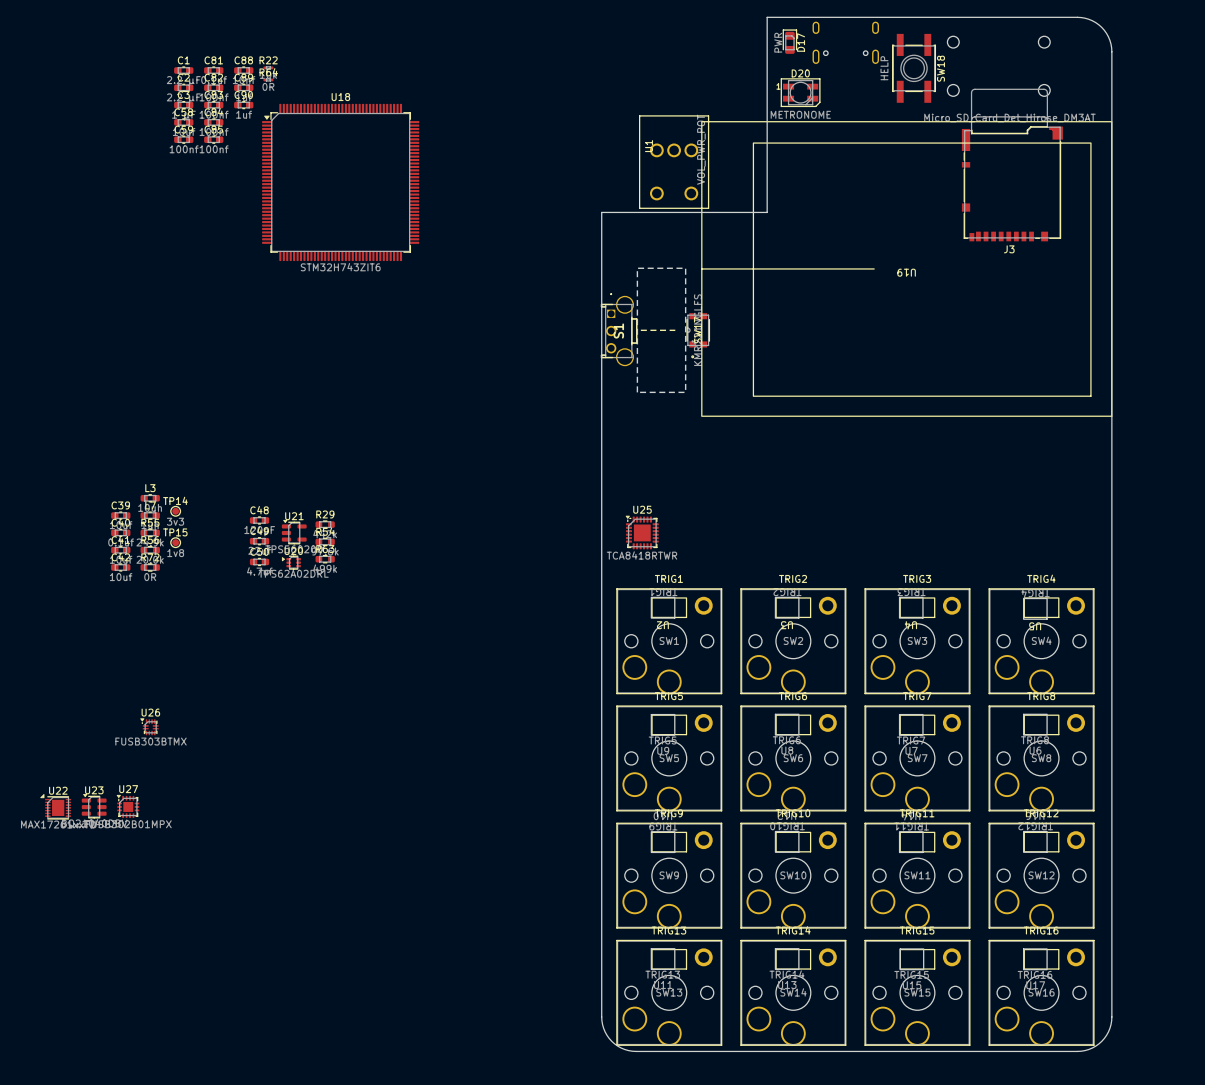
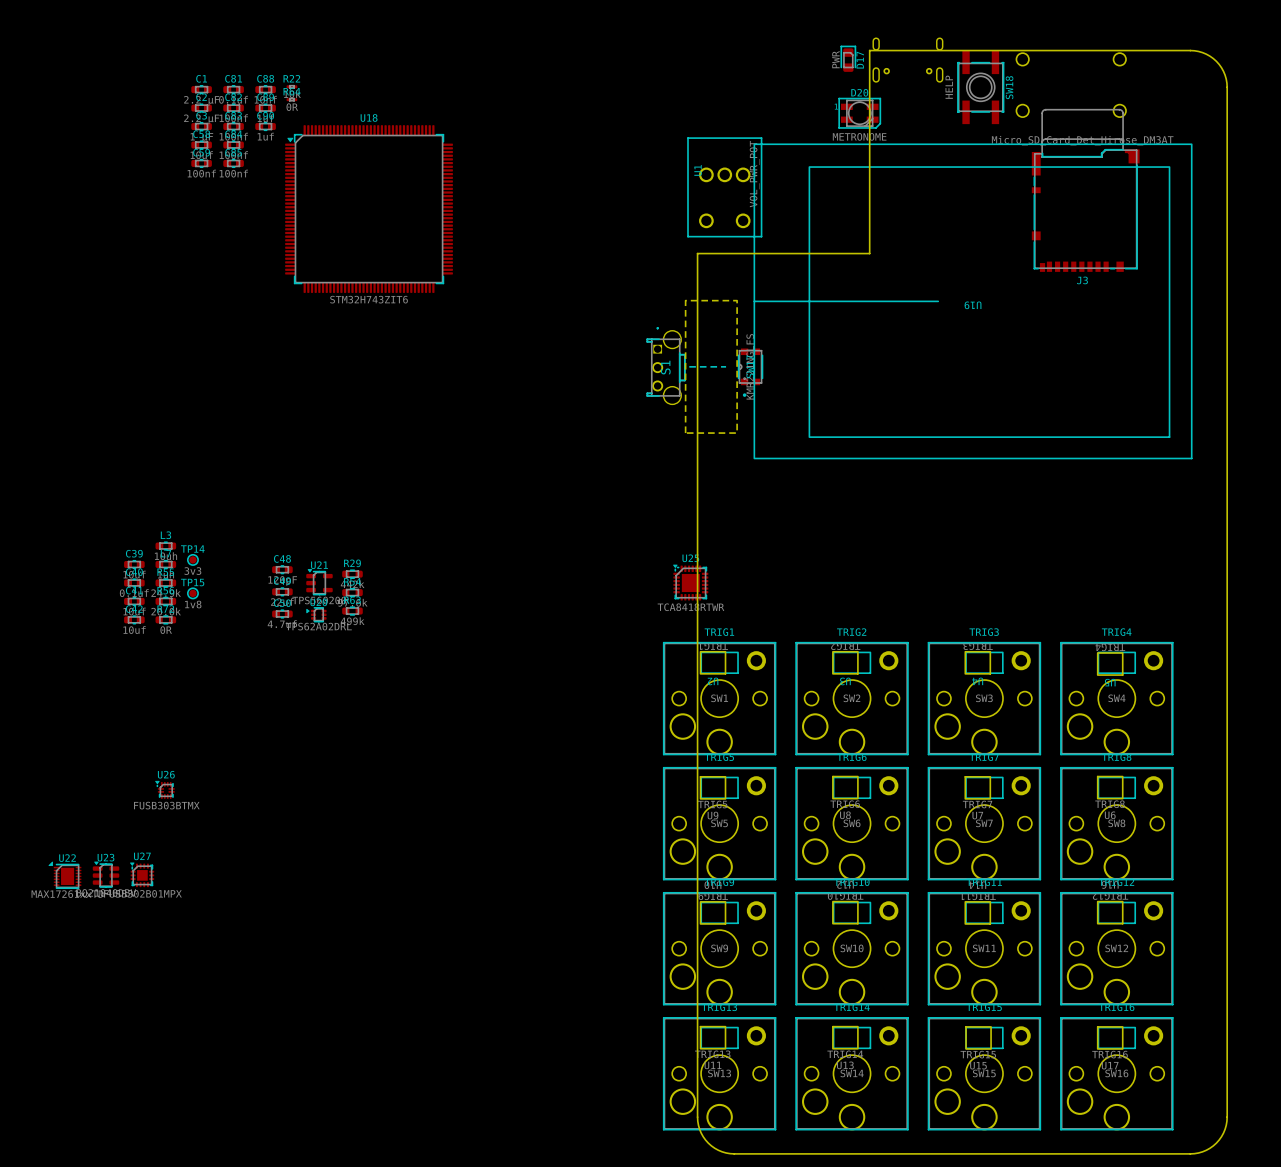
board edge: (767, 17) (767, 212) (601, 212) (601, 1016) (603, 1028) (614, 1043) (624, 1049) (636, 1051) (1077, 1051) (1088, 1049) (1104, 1038) (1109, 1028) (1111, 1016) (1111, 51) (1109, 40) (1098, 24) (1081, 17) (767, 17) -> (869, 50) (869, 253) (697, 253) (697, 1117) (699, 1129) (705, 1140) (714, 1148) (734, 1153) (1190, 1153) (1202, 1151) (1219, 1140) (1225, 1129) (1227, 1117) (1227, 87) (1225, 75) (1213, 58) (1194, 50) (869, 50)

